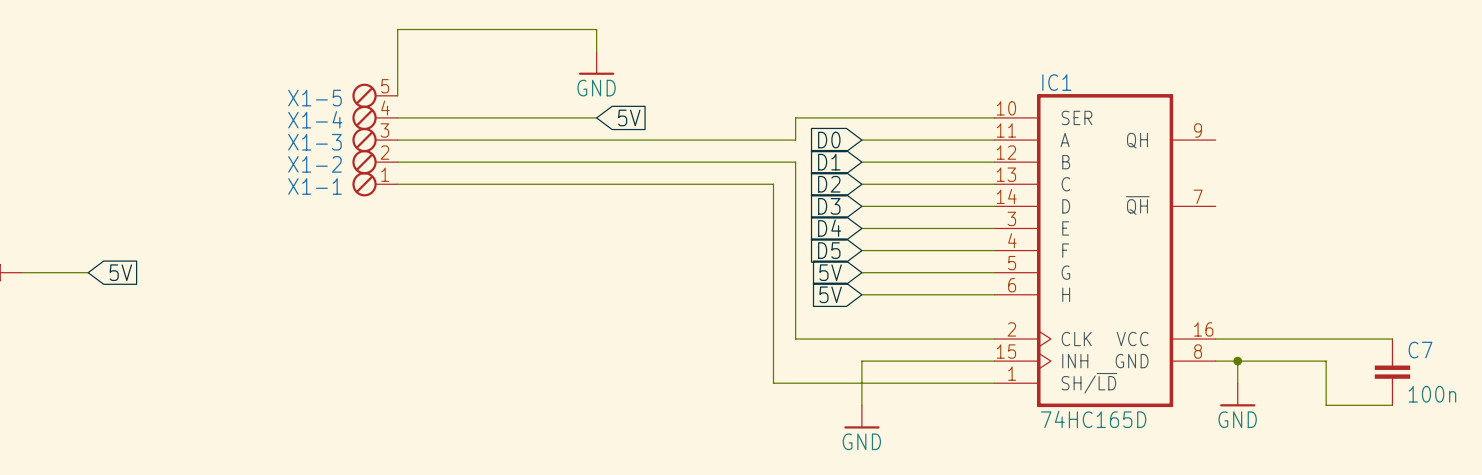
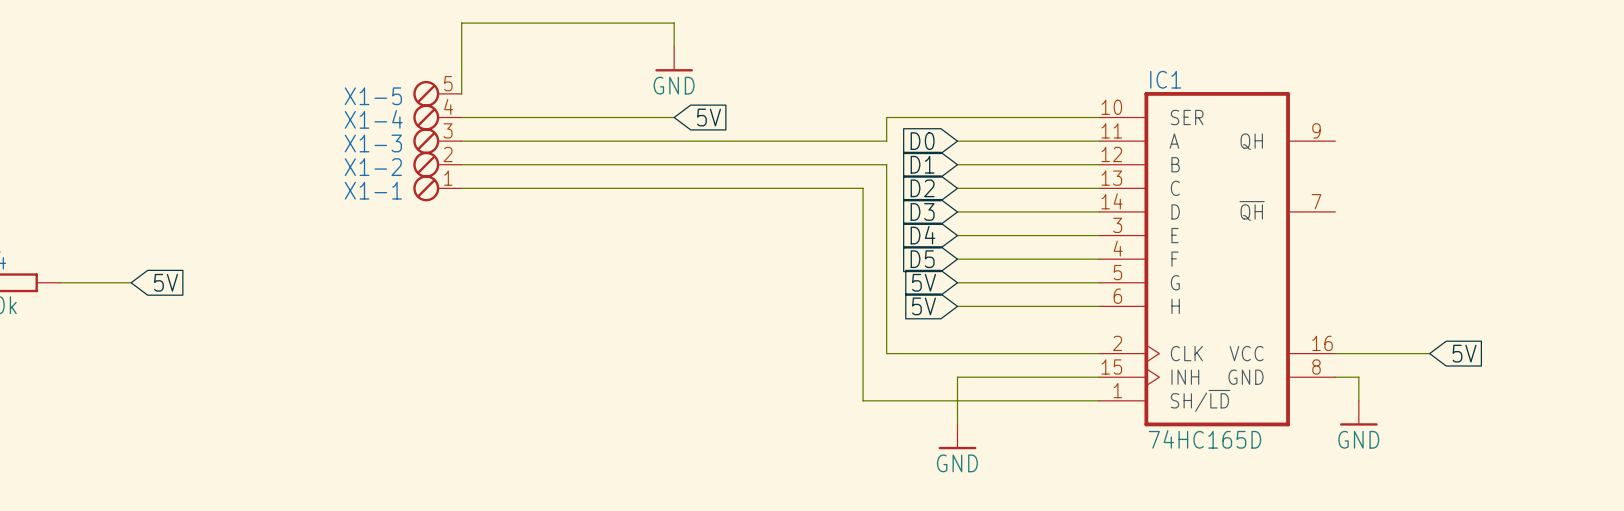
wire: (1304, 339) (1392, 339) -> none
global label: none -> 5V (1464, 353)
wire: (1237, 361) (1326, 361) (1326, 405) (1392, 405) -> none
junction: (1237, 361) -> none
C7: 100n (1392, 372) -> none

